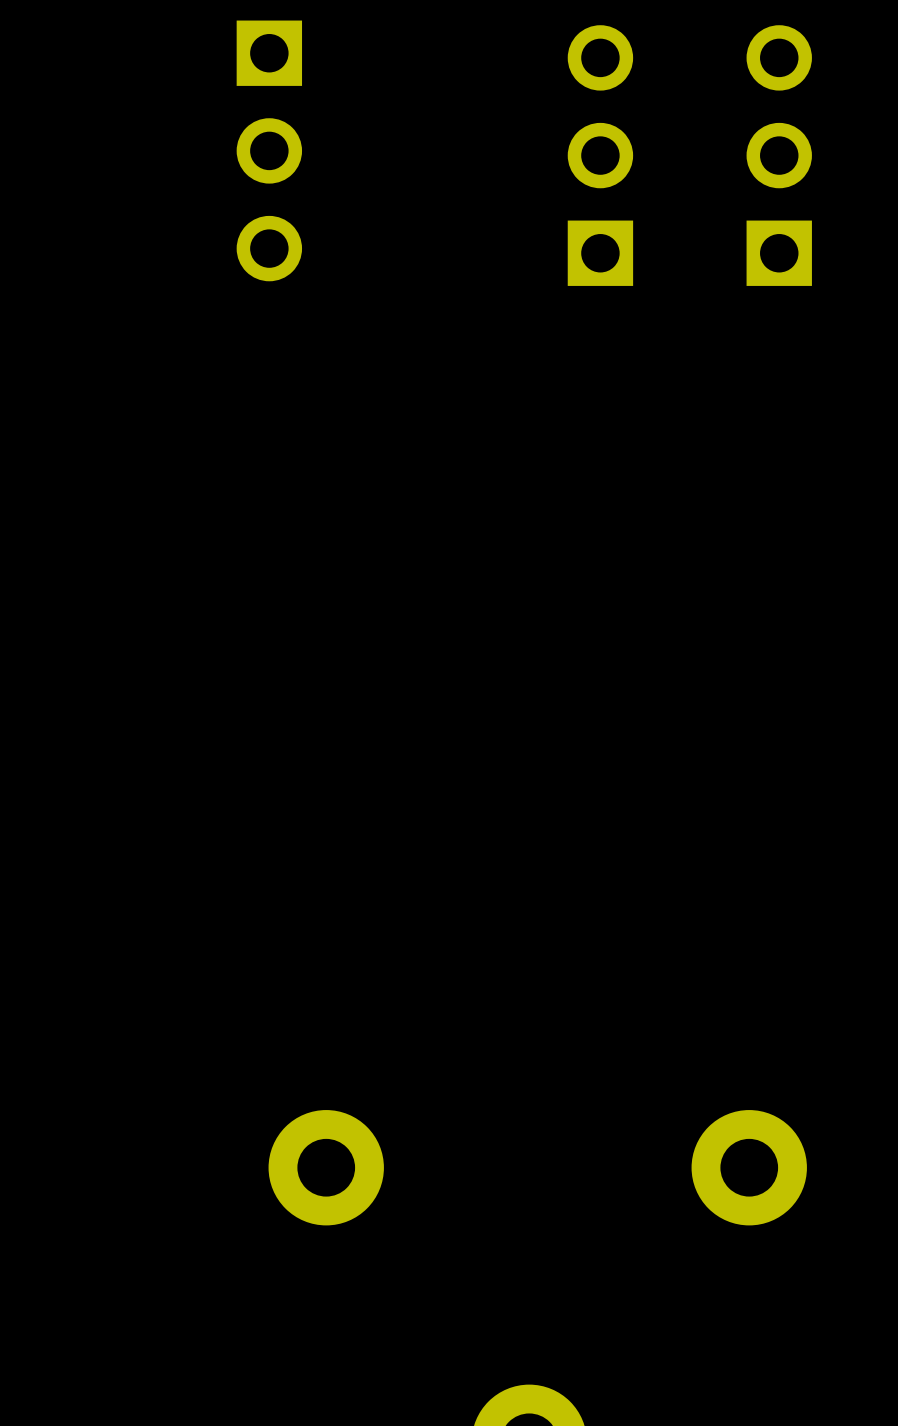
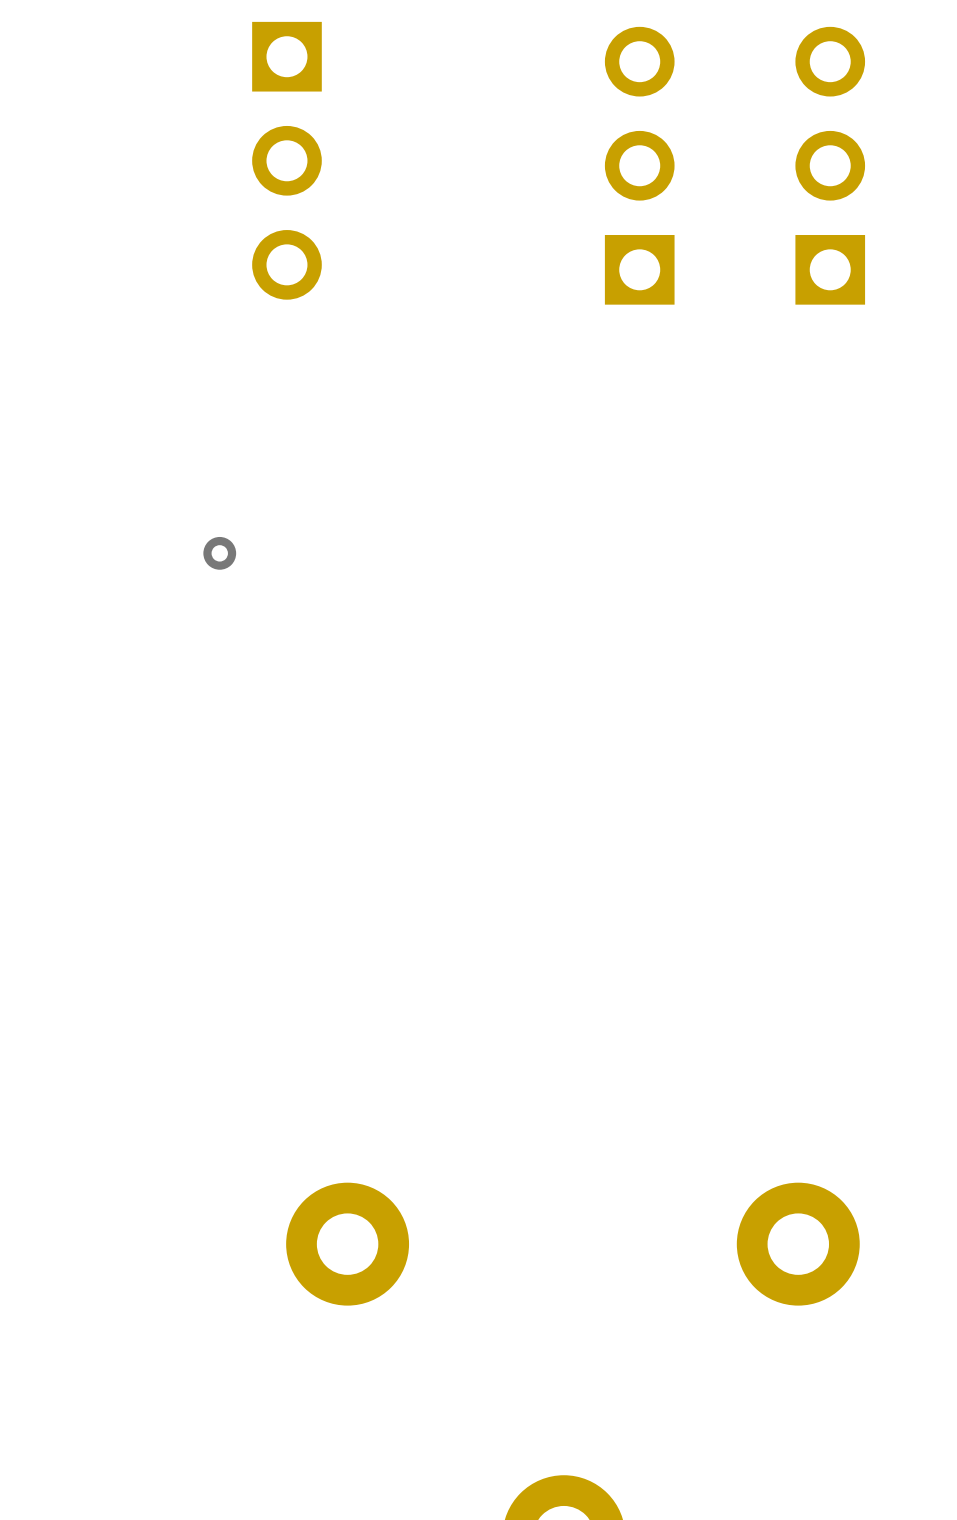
via: none -> (219, 553)

